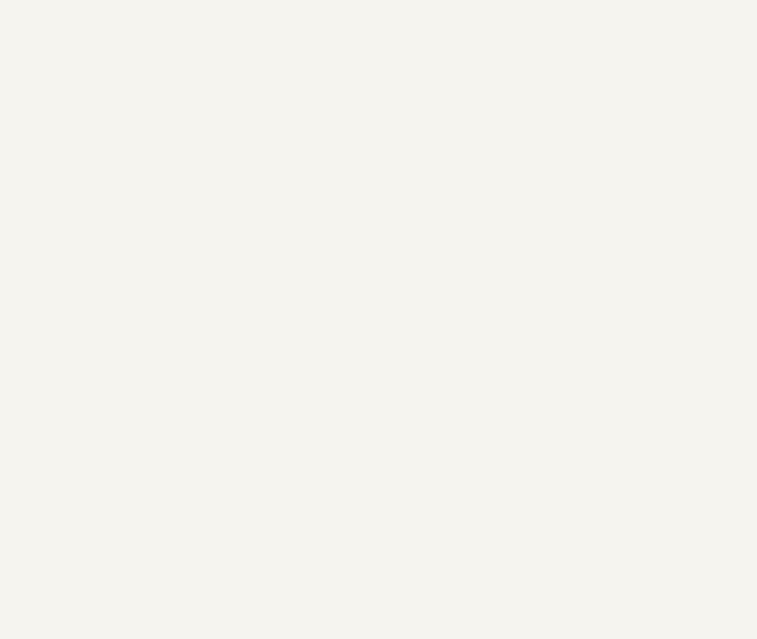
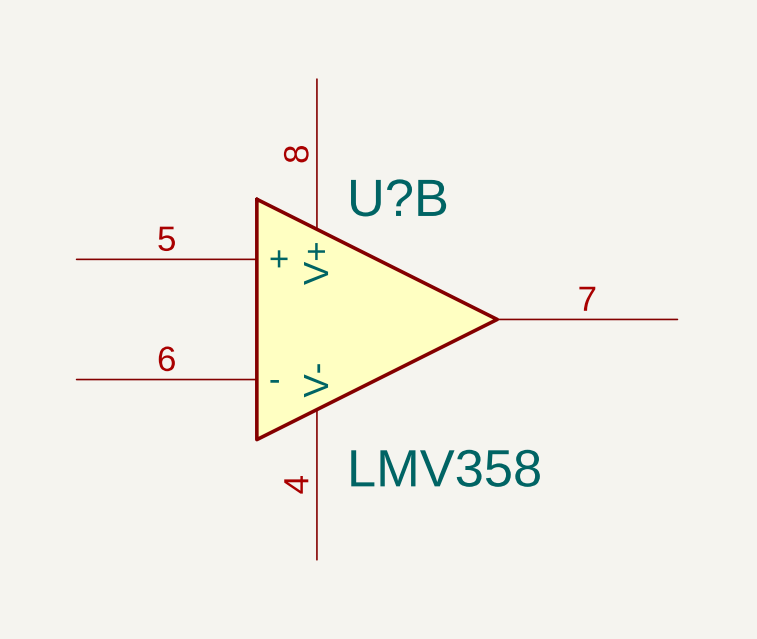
U?B: none -> LMV358 (377, 319)

